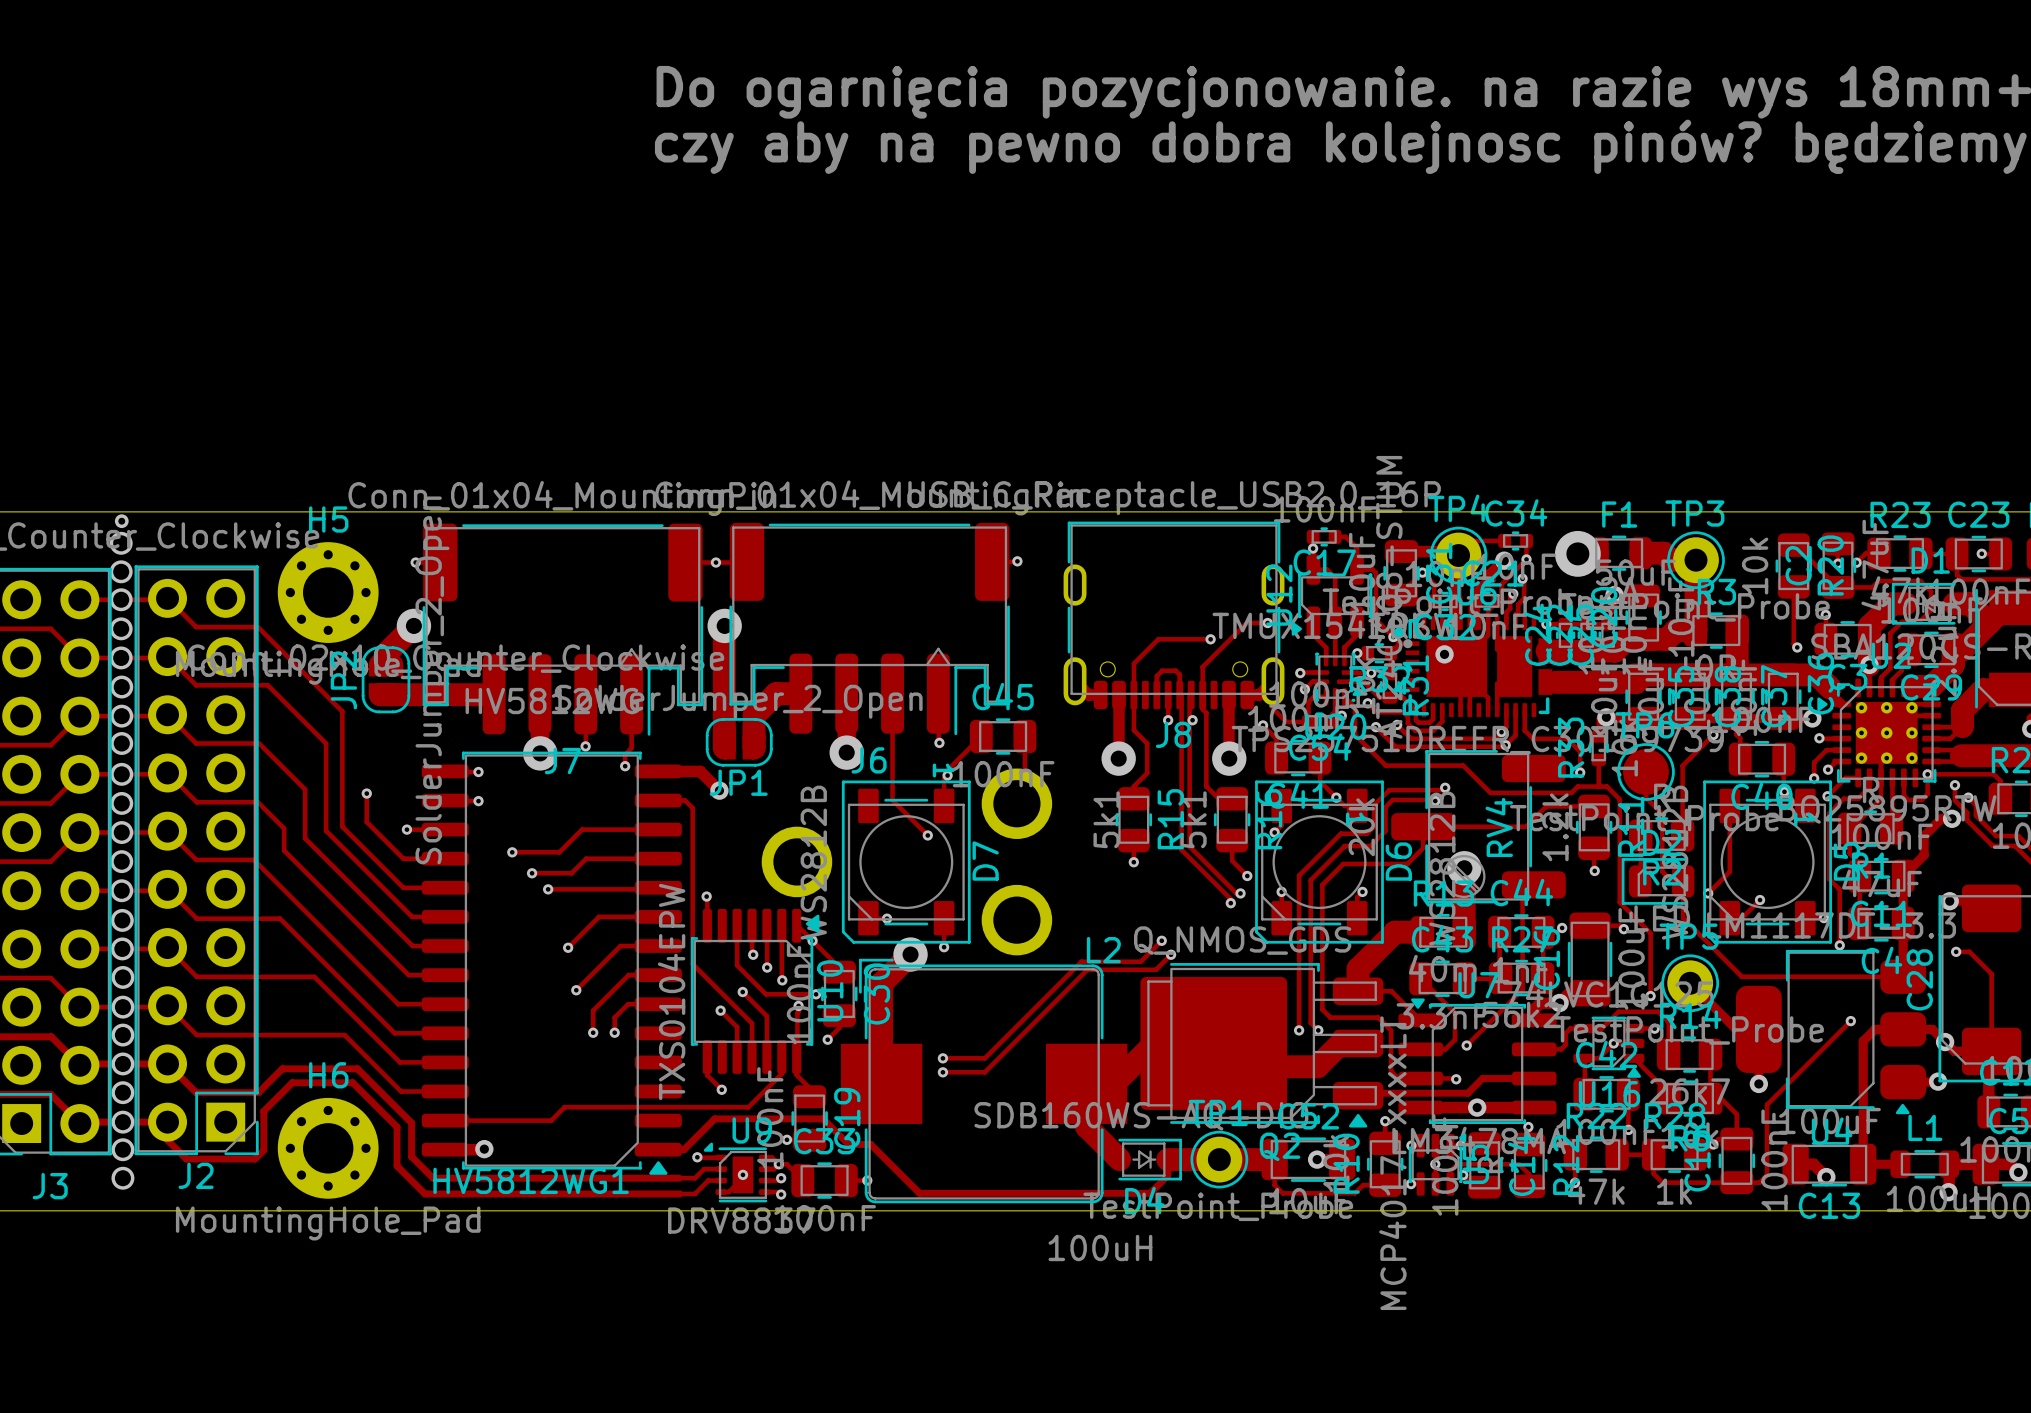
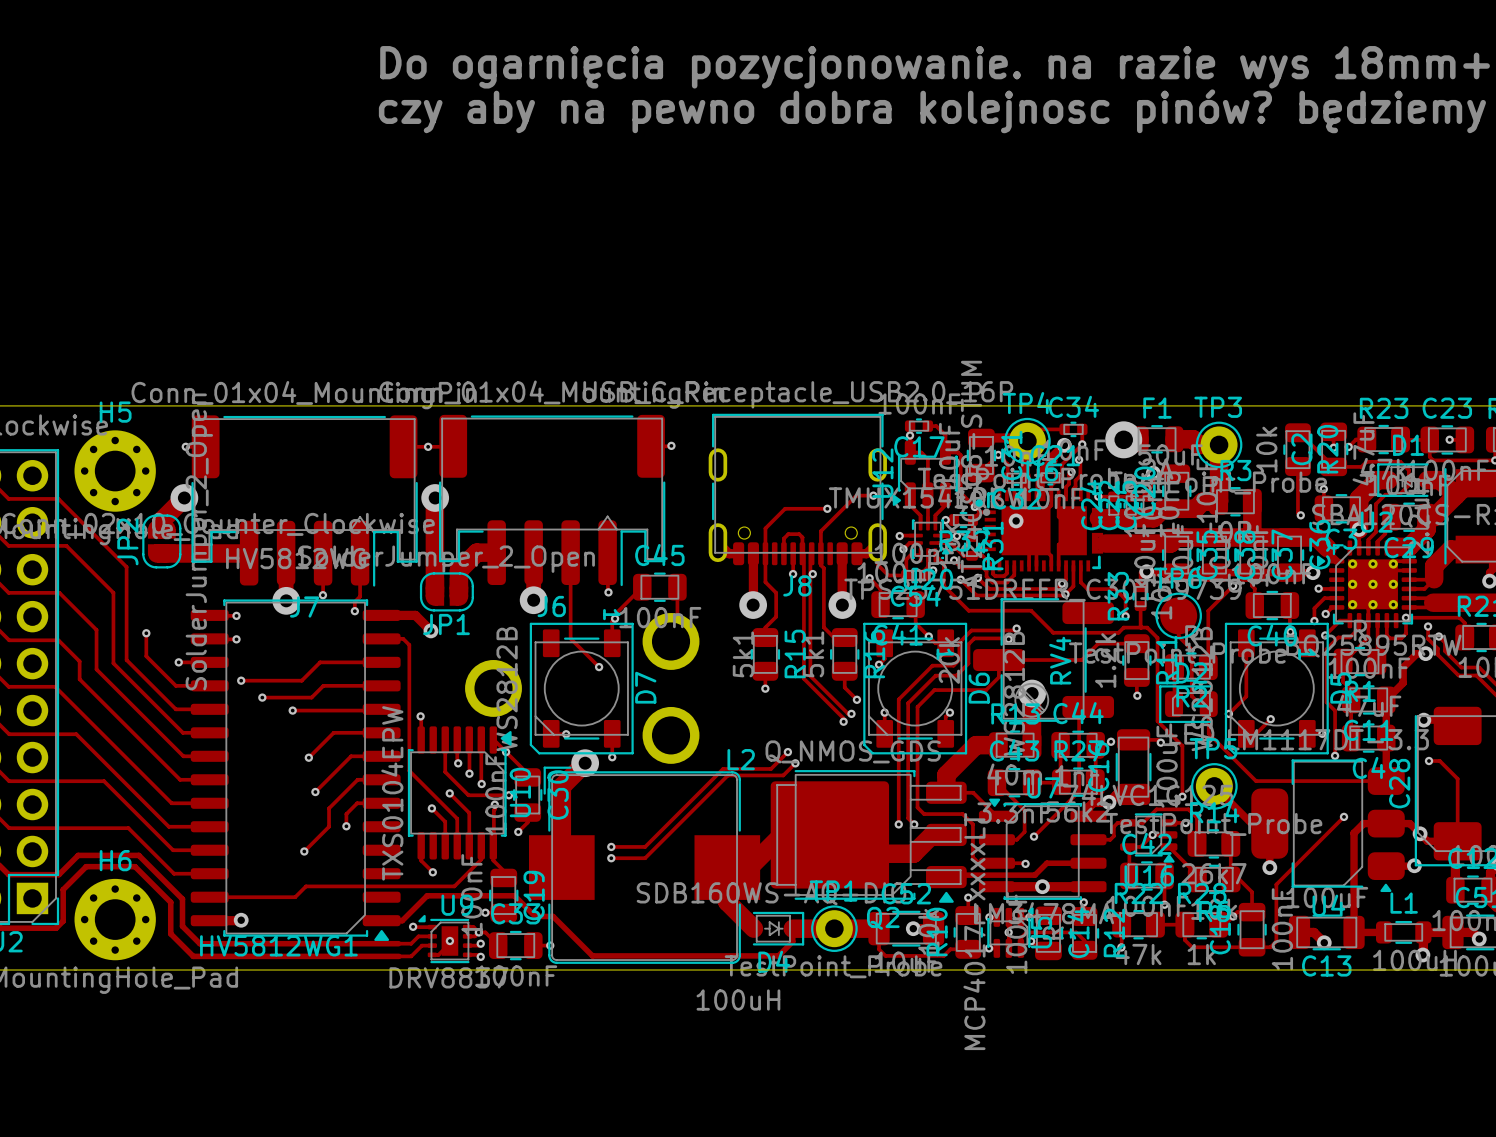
track: none -> (241, 680) (263, 680)
via: none -> (241, 680)
via: (512, 852) -> none
track: none -> (262, 697) (279, 697)
via: none -> (262, 697)
via: (532, 873) -> none
track: none -> (329, 826) (304, 851)
via position: (593, 1032) -> (304, 851)

